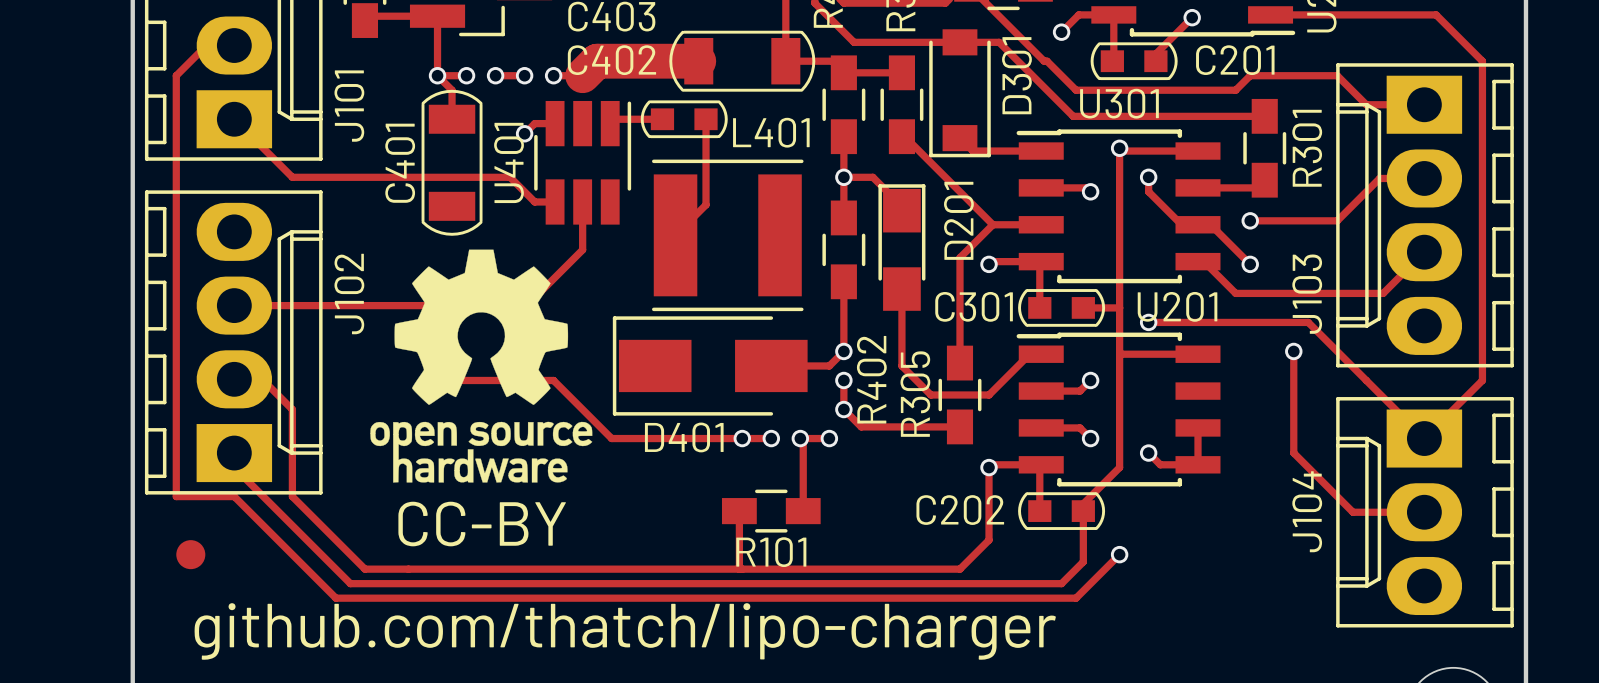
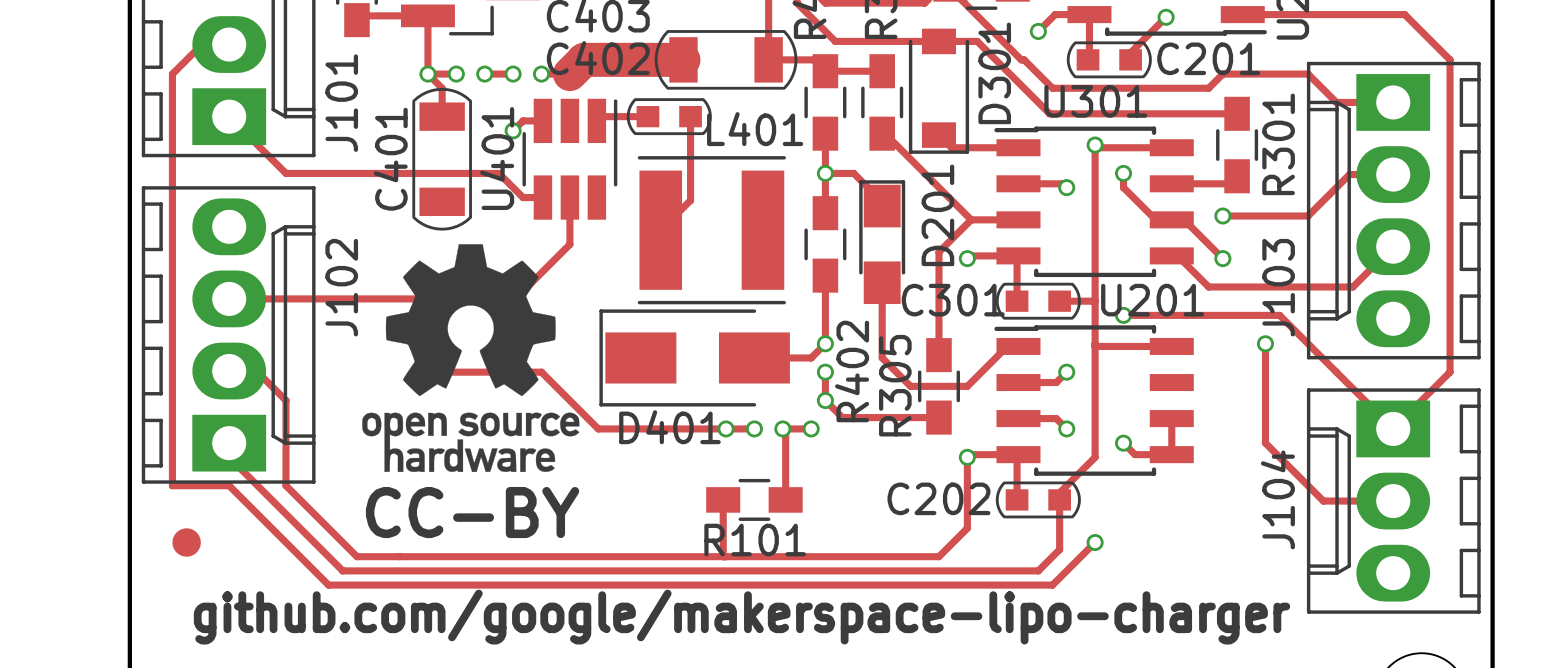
text: github.com/thatch/lipo-charger (625, 631) -> github.com/google/makerspace-lipo-charger (742, 617)

